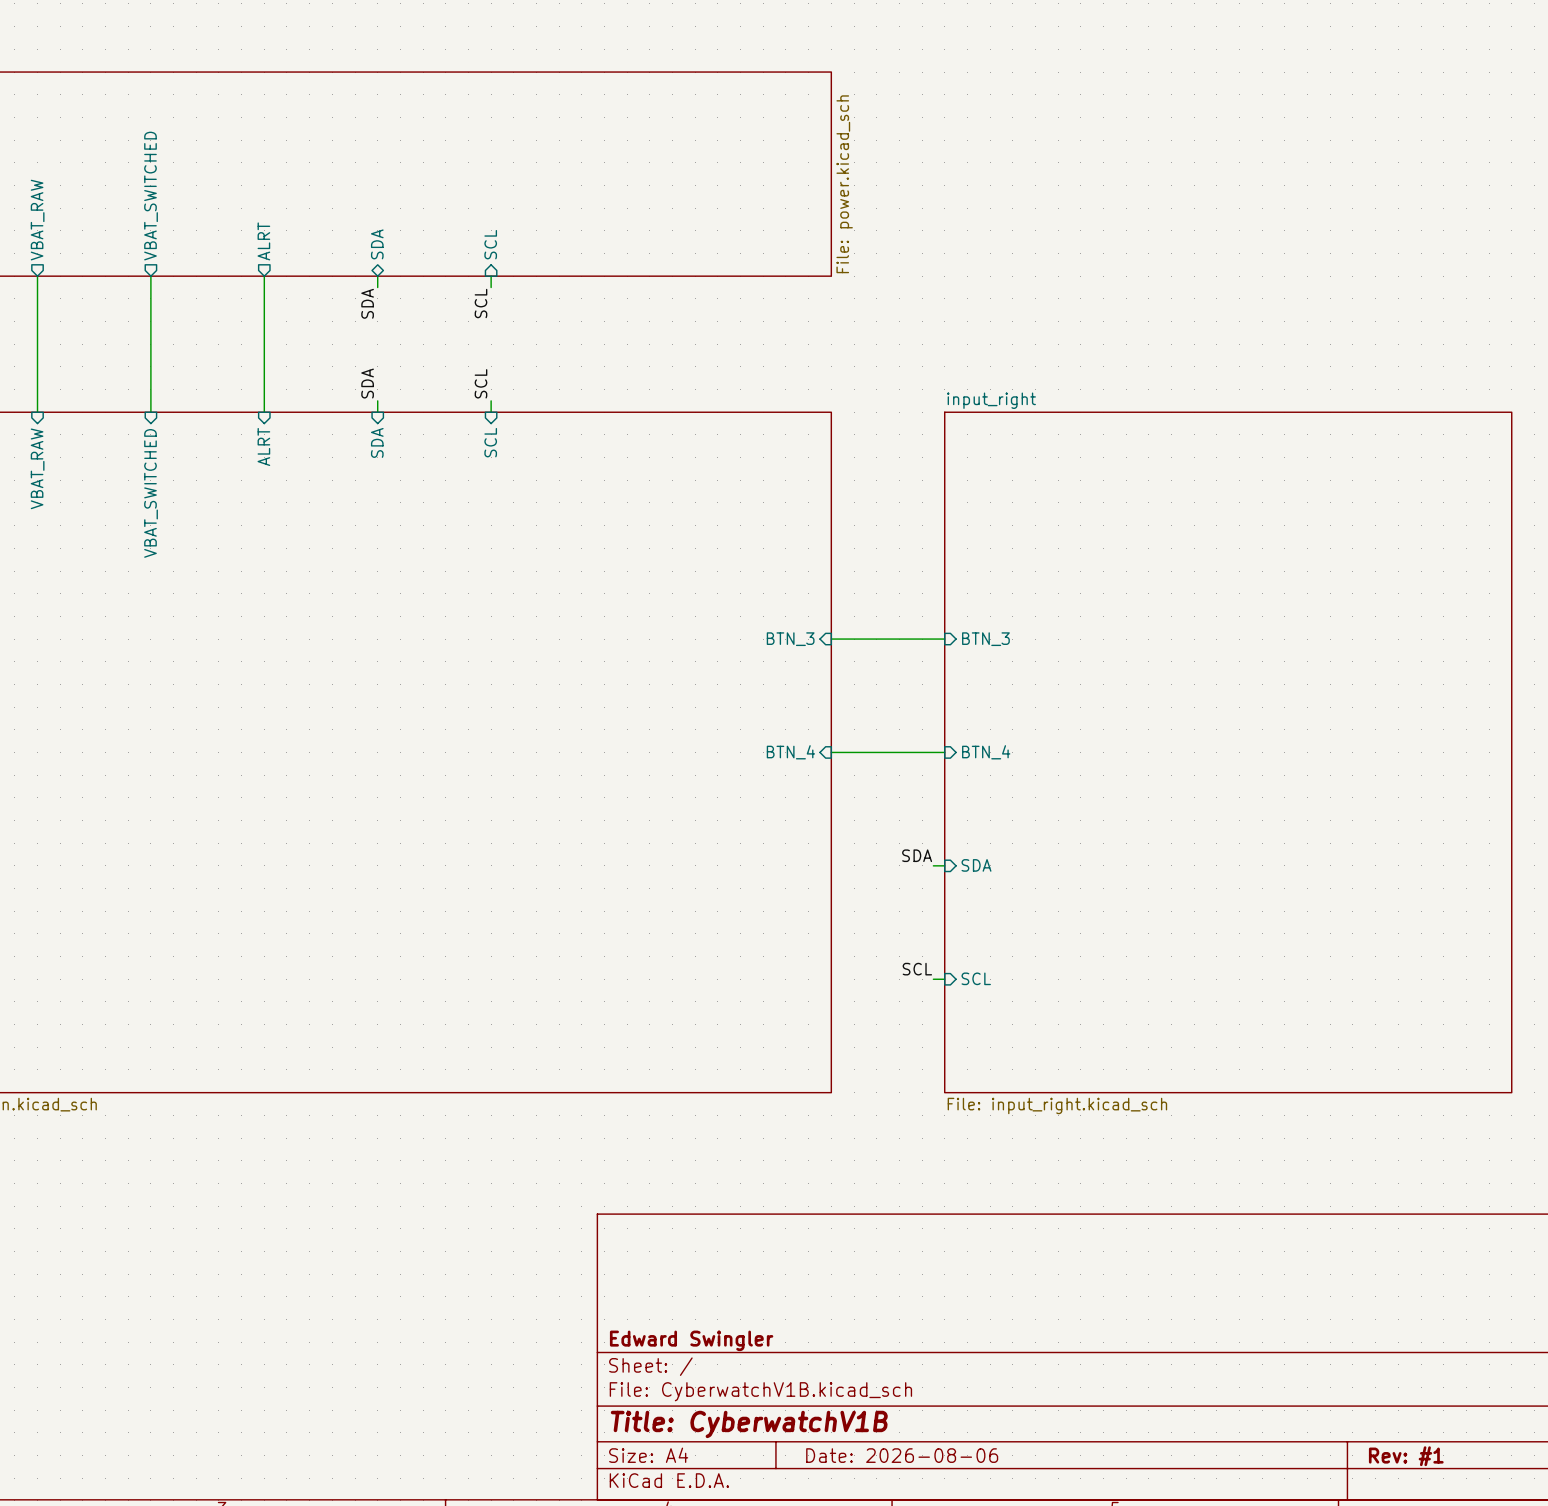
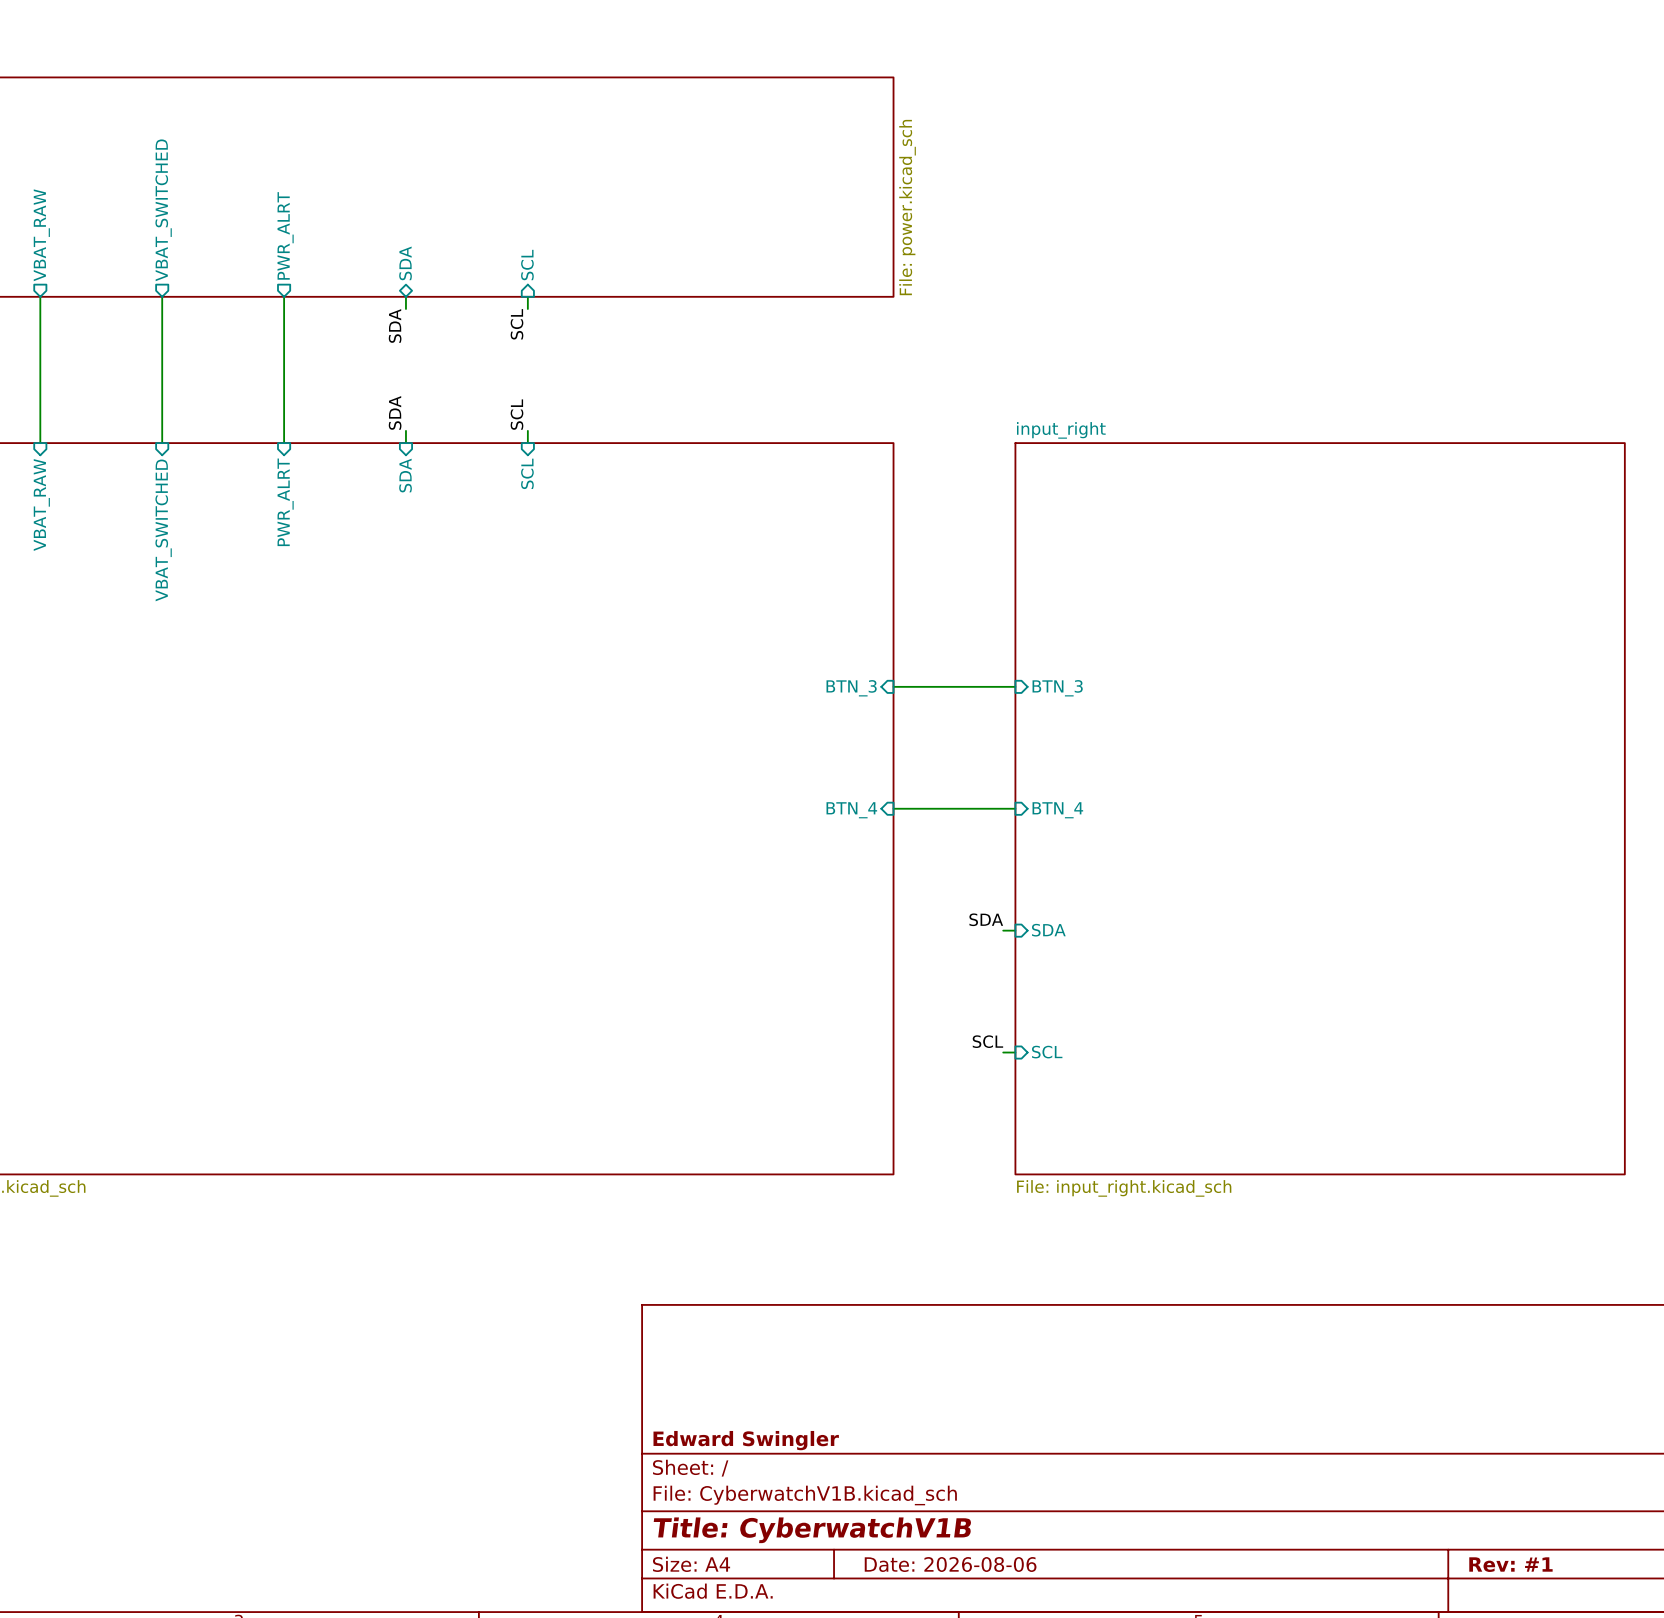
sheet pin: ALRT (263, 241) -> PWR_ALRT (285, 235)
sheet pin: ALRT (263, 446) -> PWR_ALRT (285, 502)

